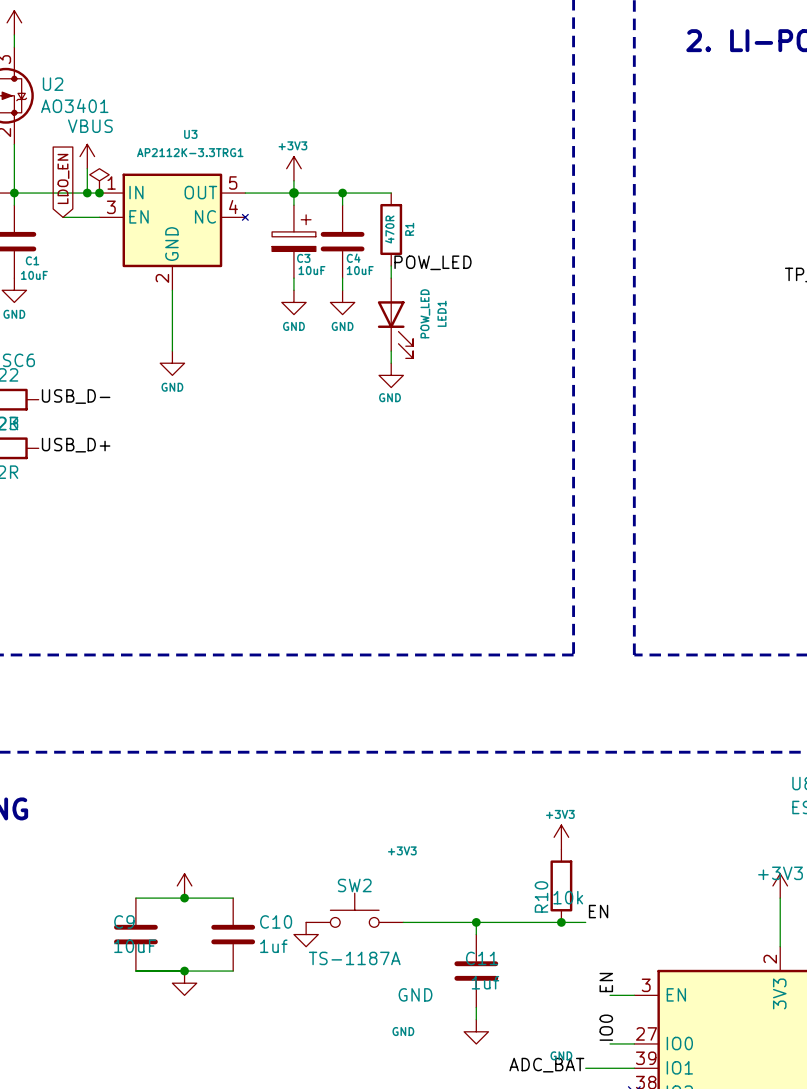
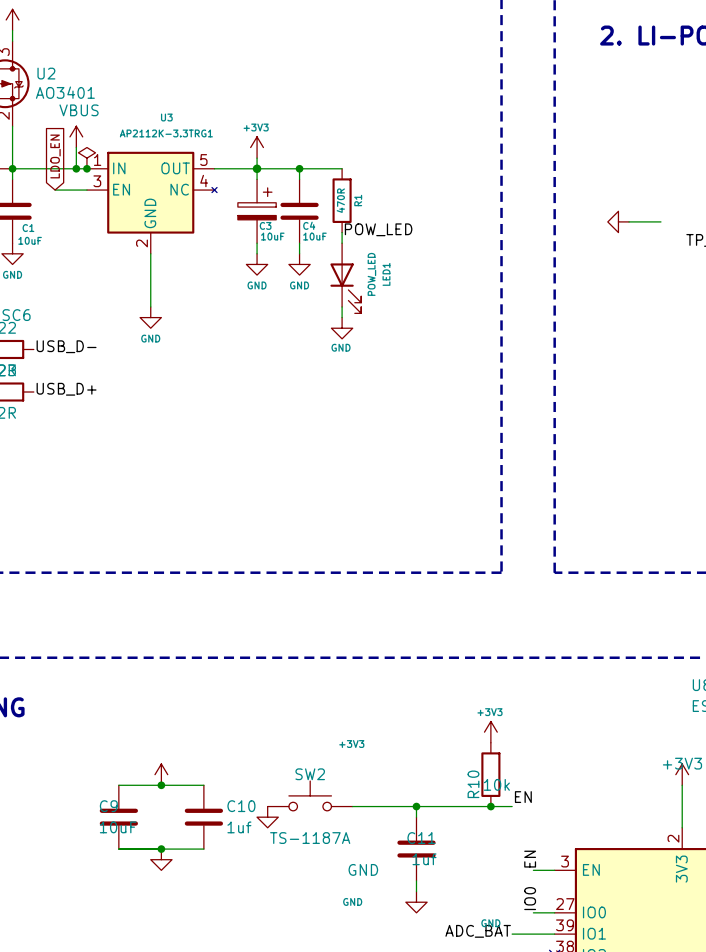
power symbol: none -> (618, 221)
wire: none -> (629, 221) (660, 221)

